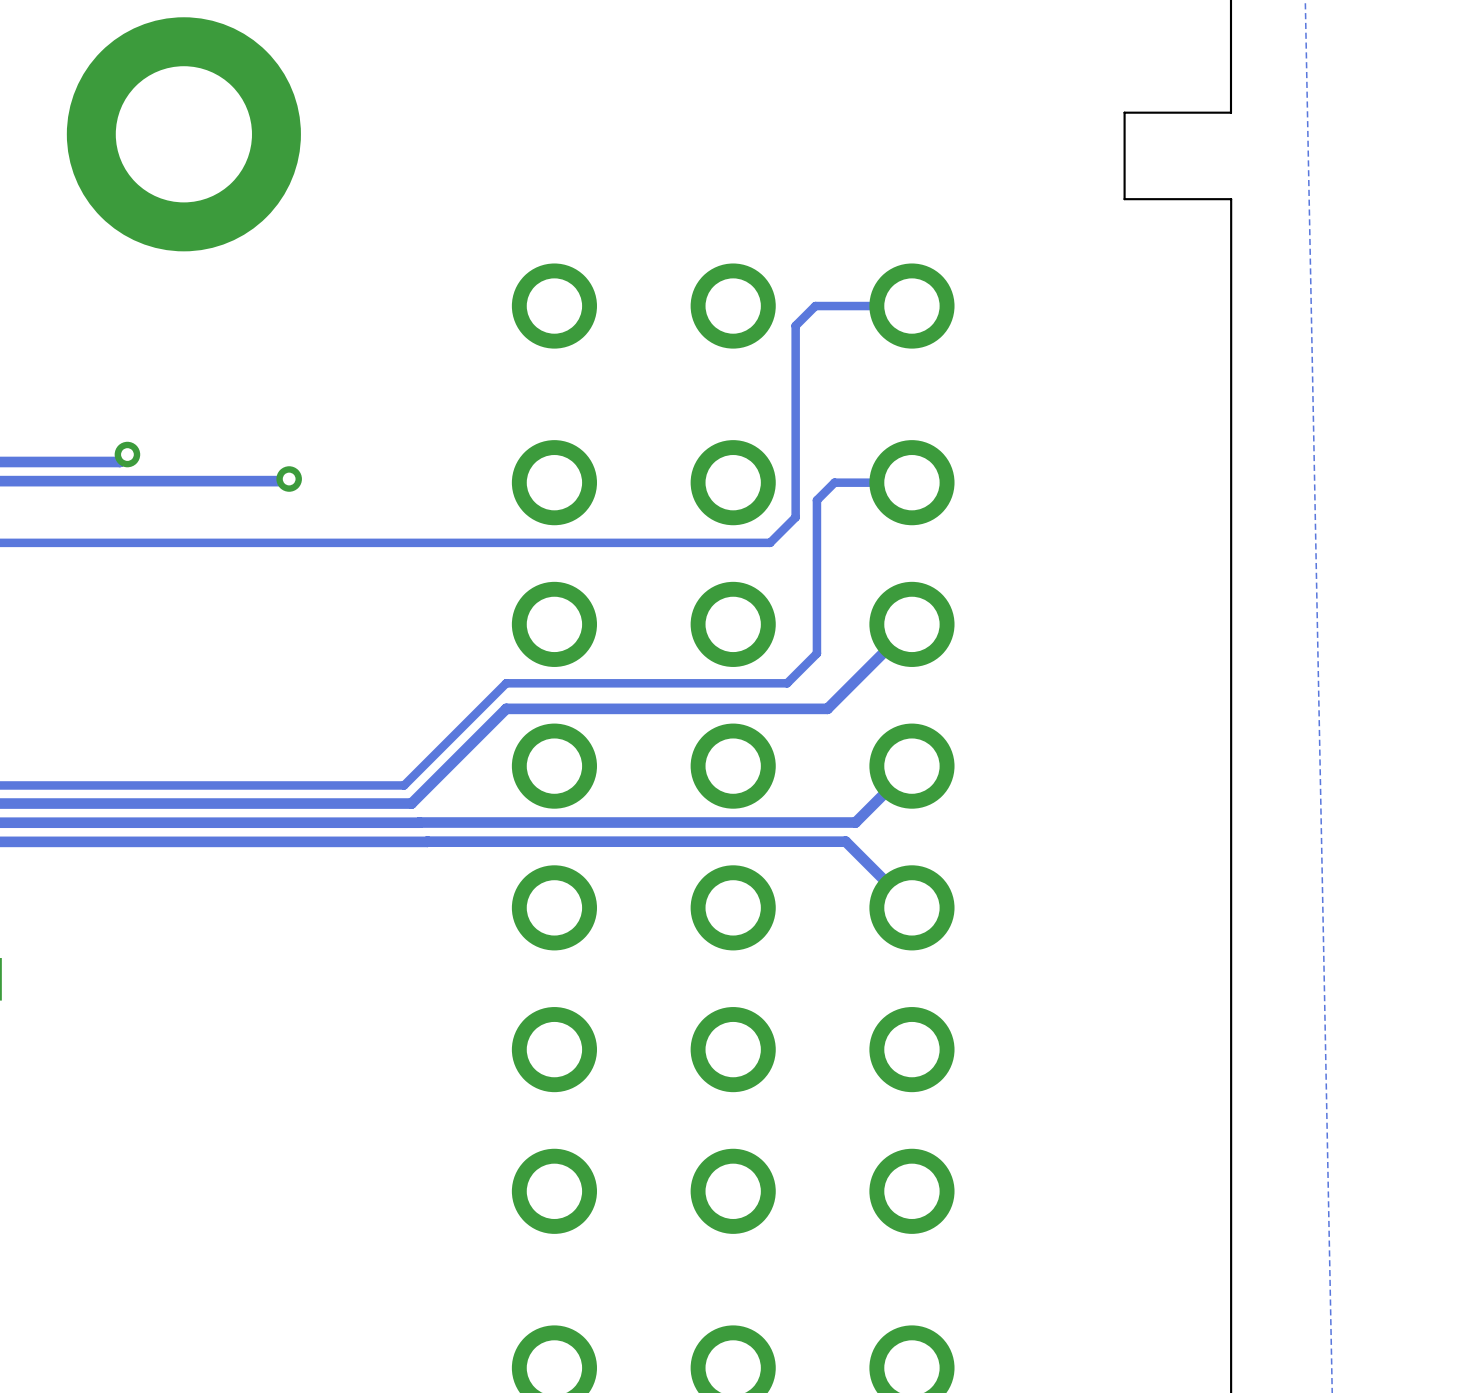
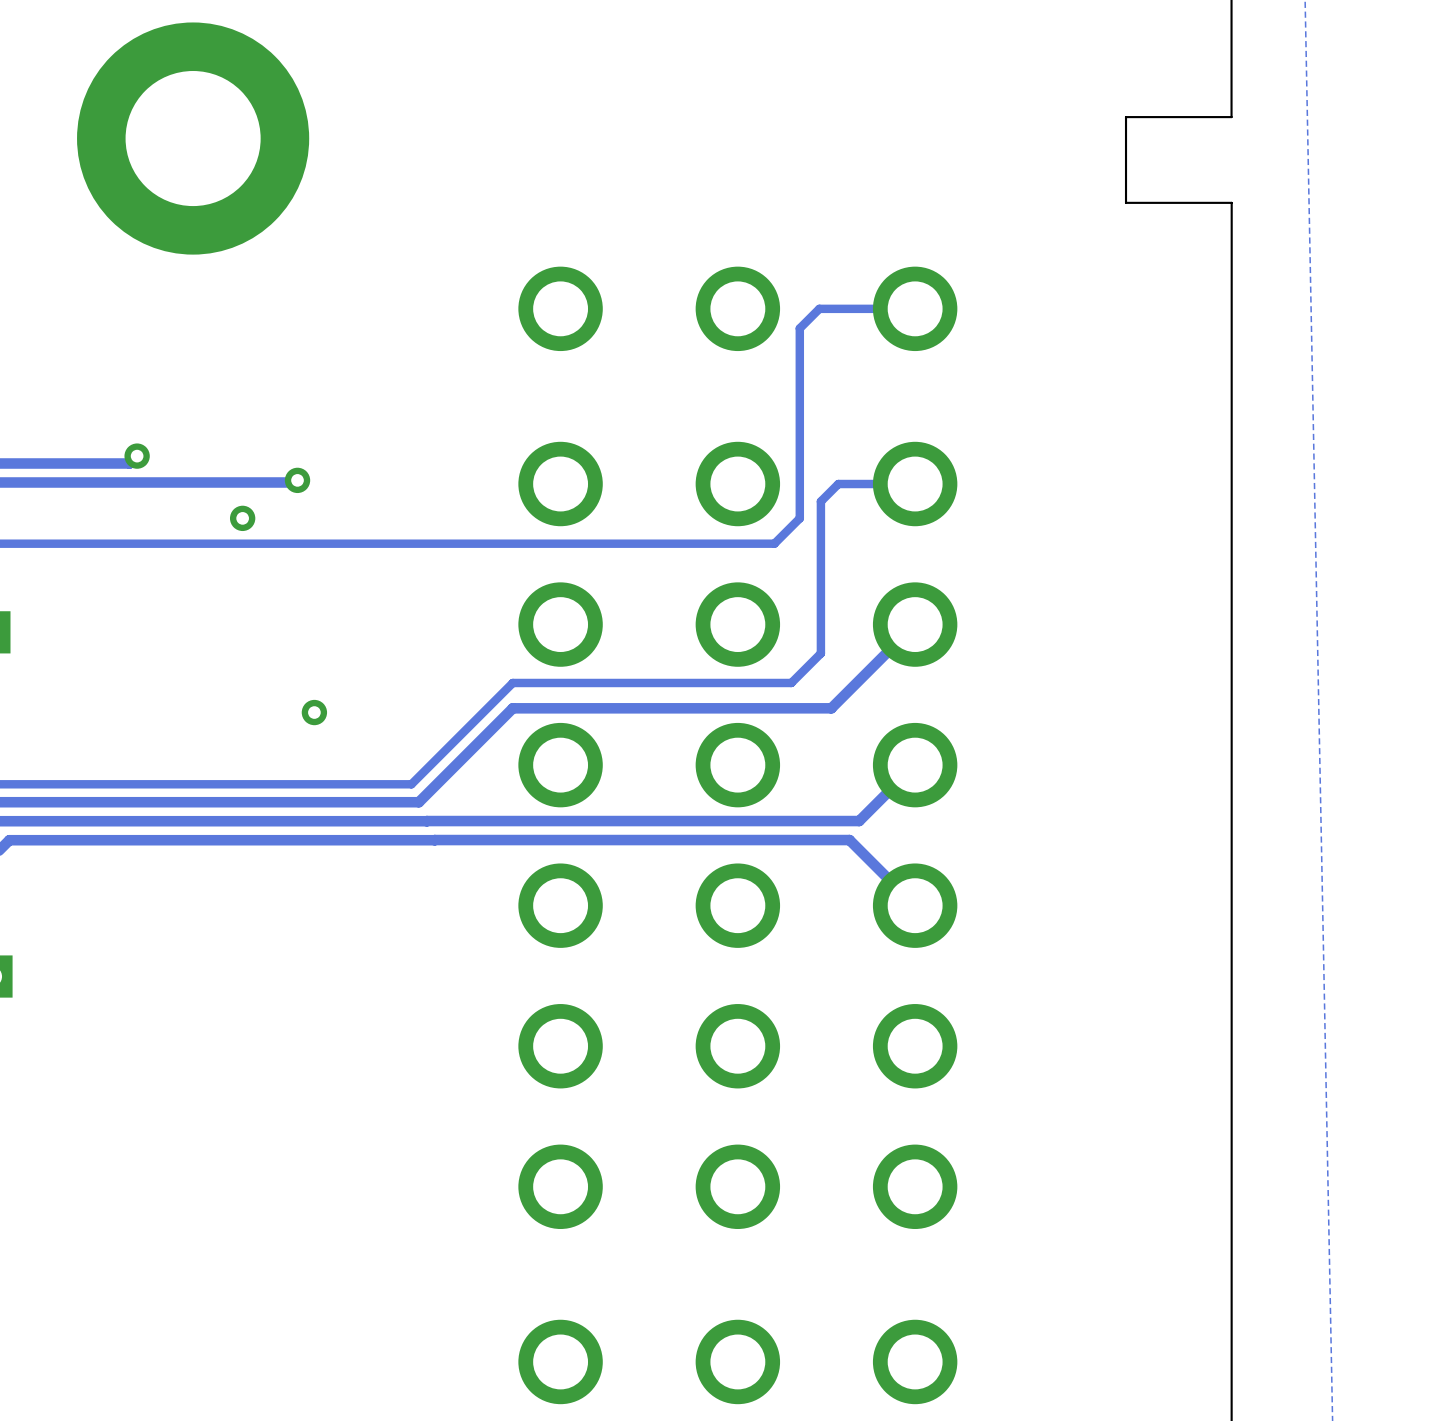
via: none -> (242, 518)
via: none -> (314, 712)

